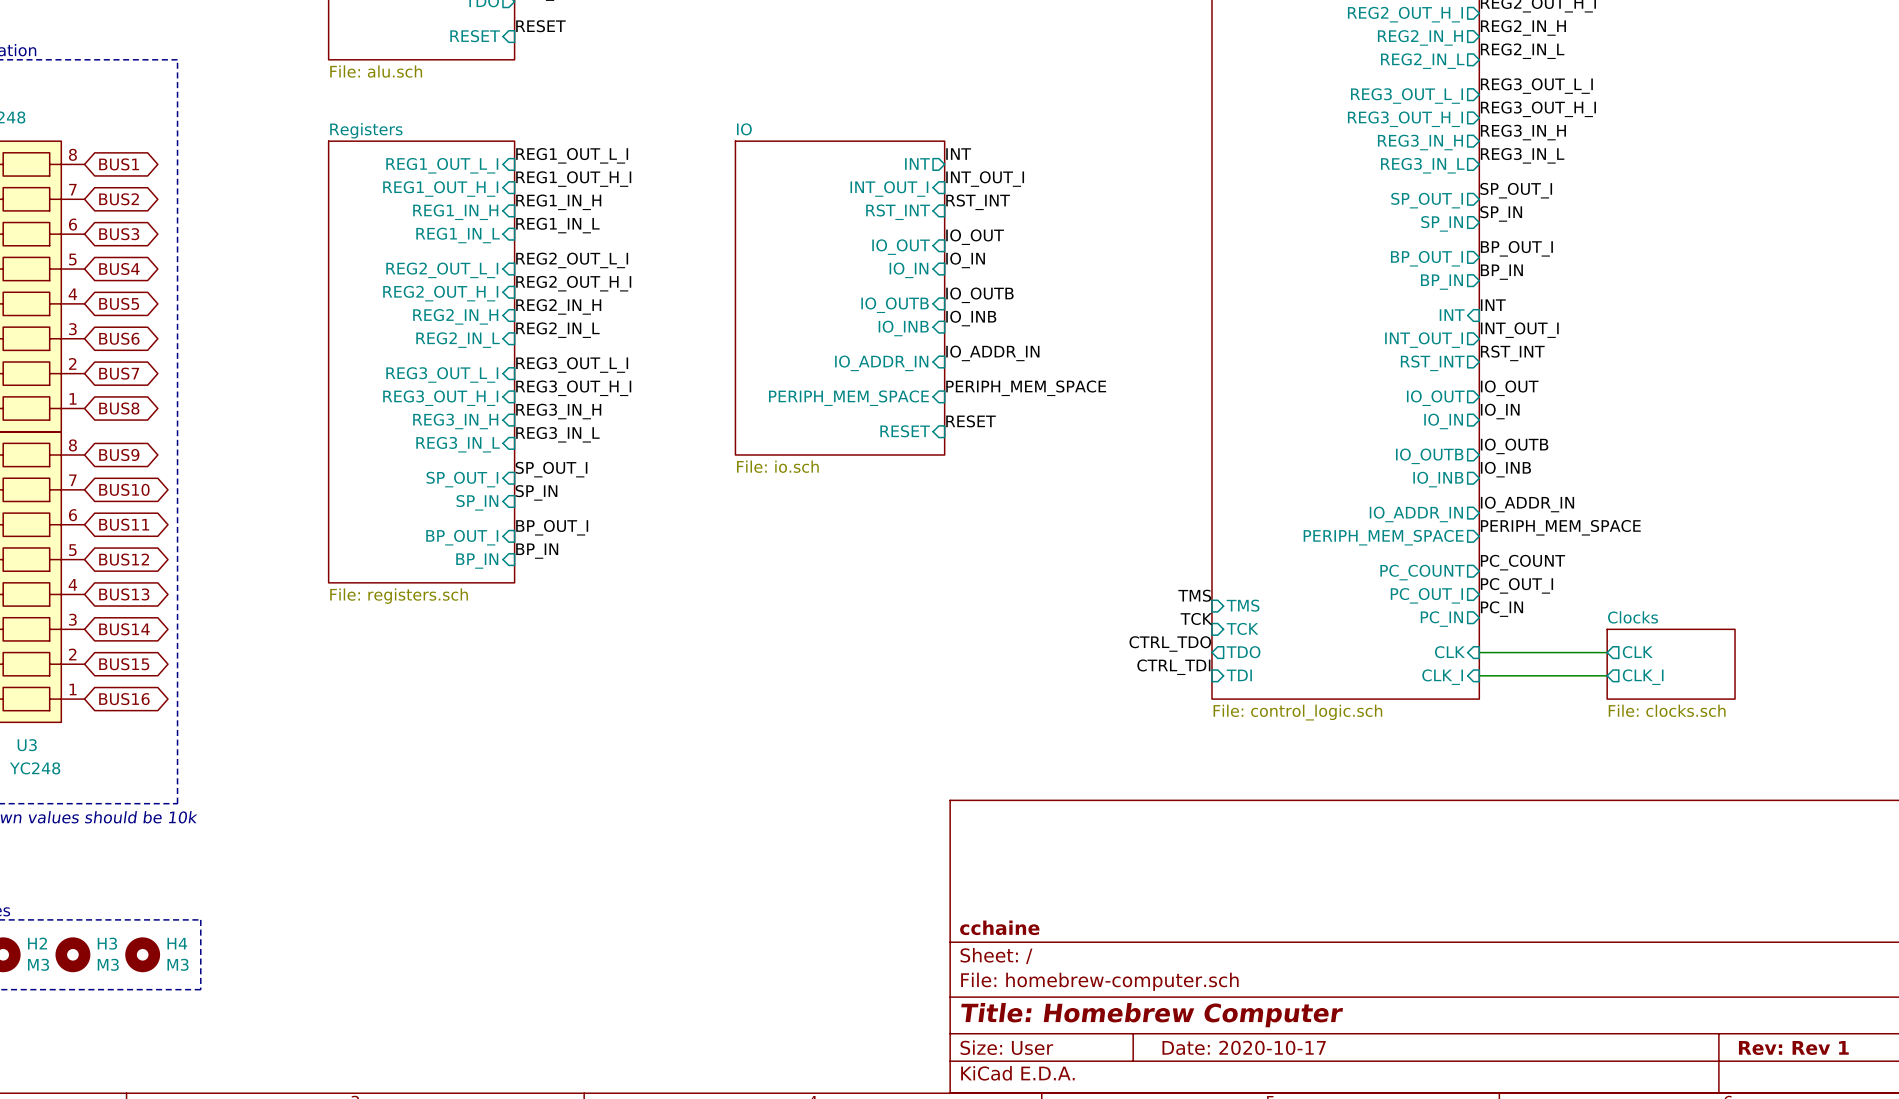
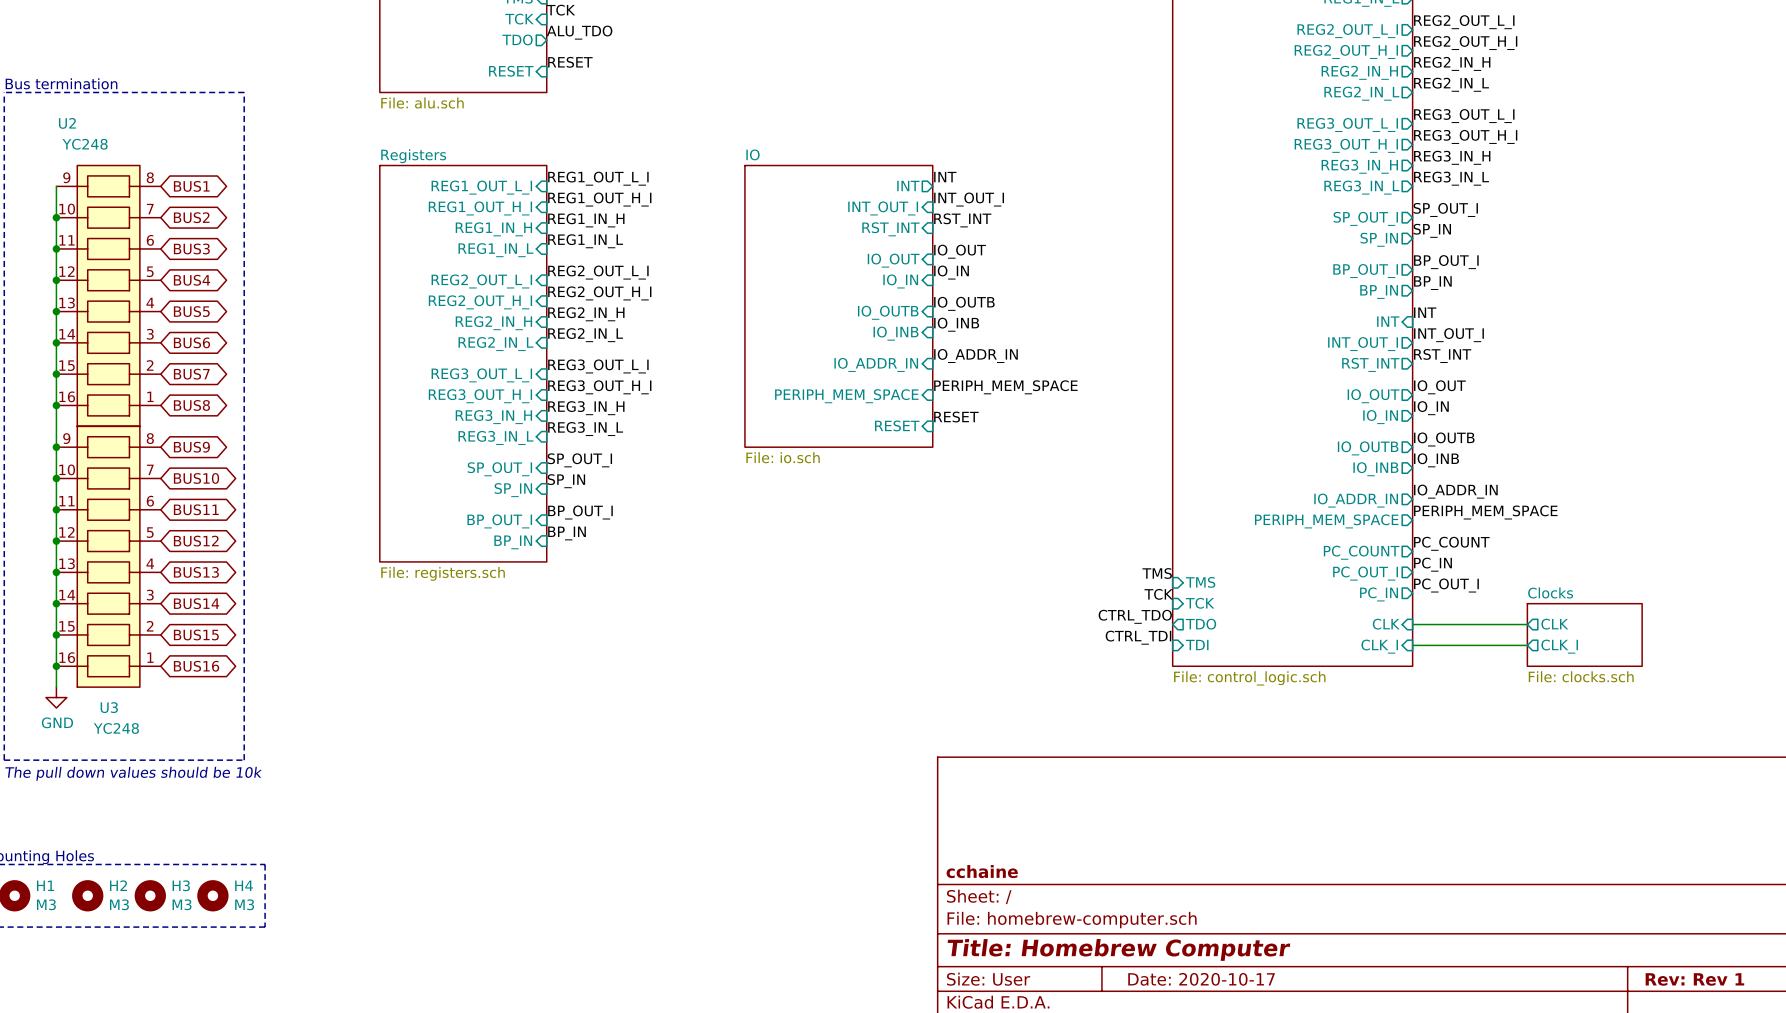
label: PC_OUT_I (1516, 585) -> PC_IN (1432, 564)
label: PC_IN (1501, 609) -> PC_OUT_I (1446, 585)

